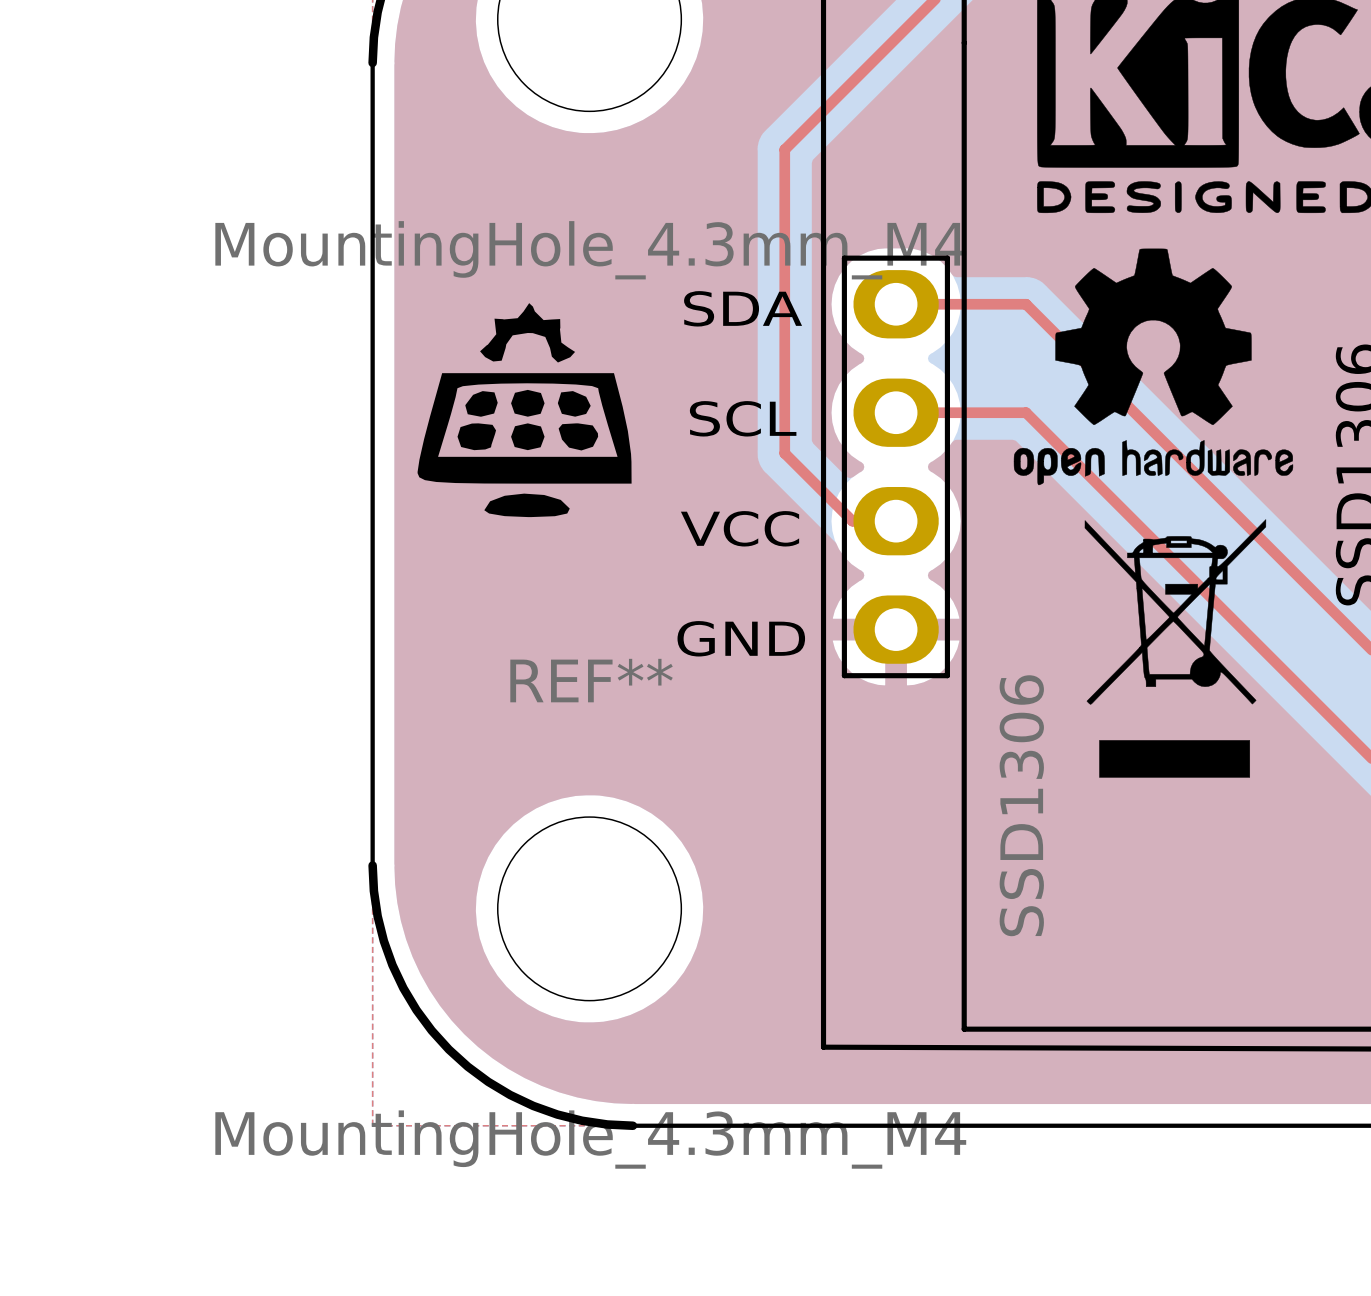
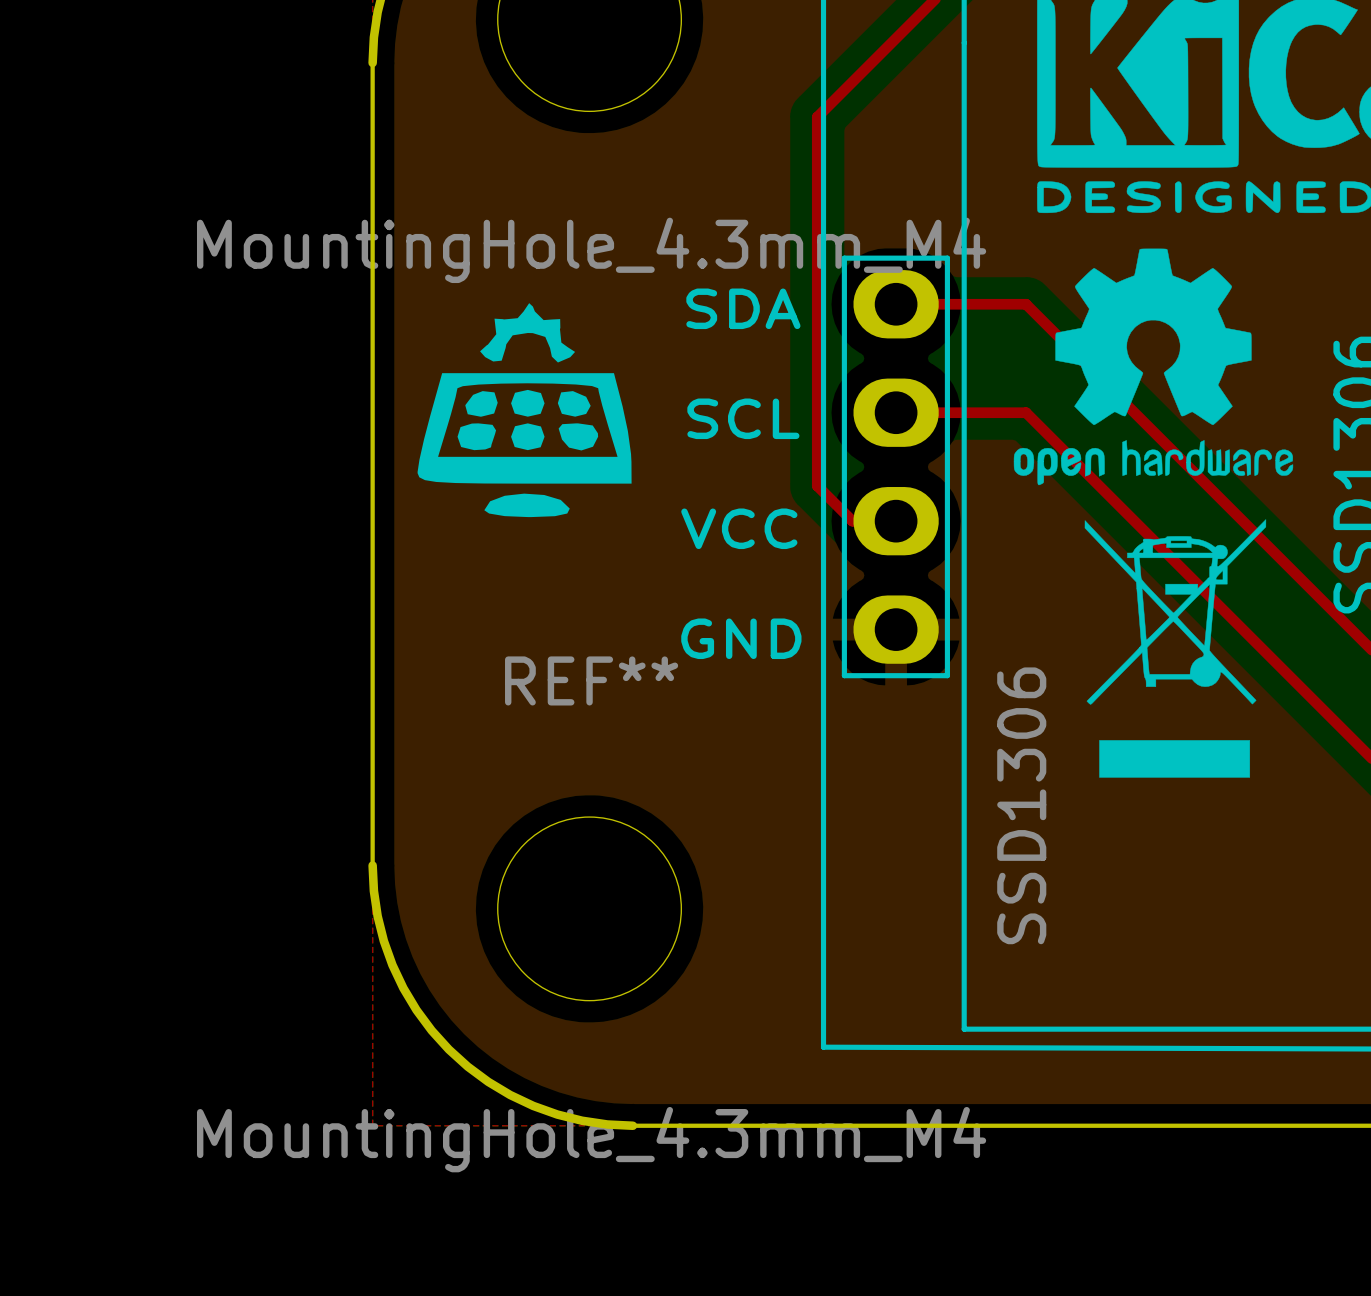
top track: (817, 117) (784, 149) (784, 453) (817, 485) -> (817, 117) (817, 485)

